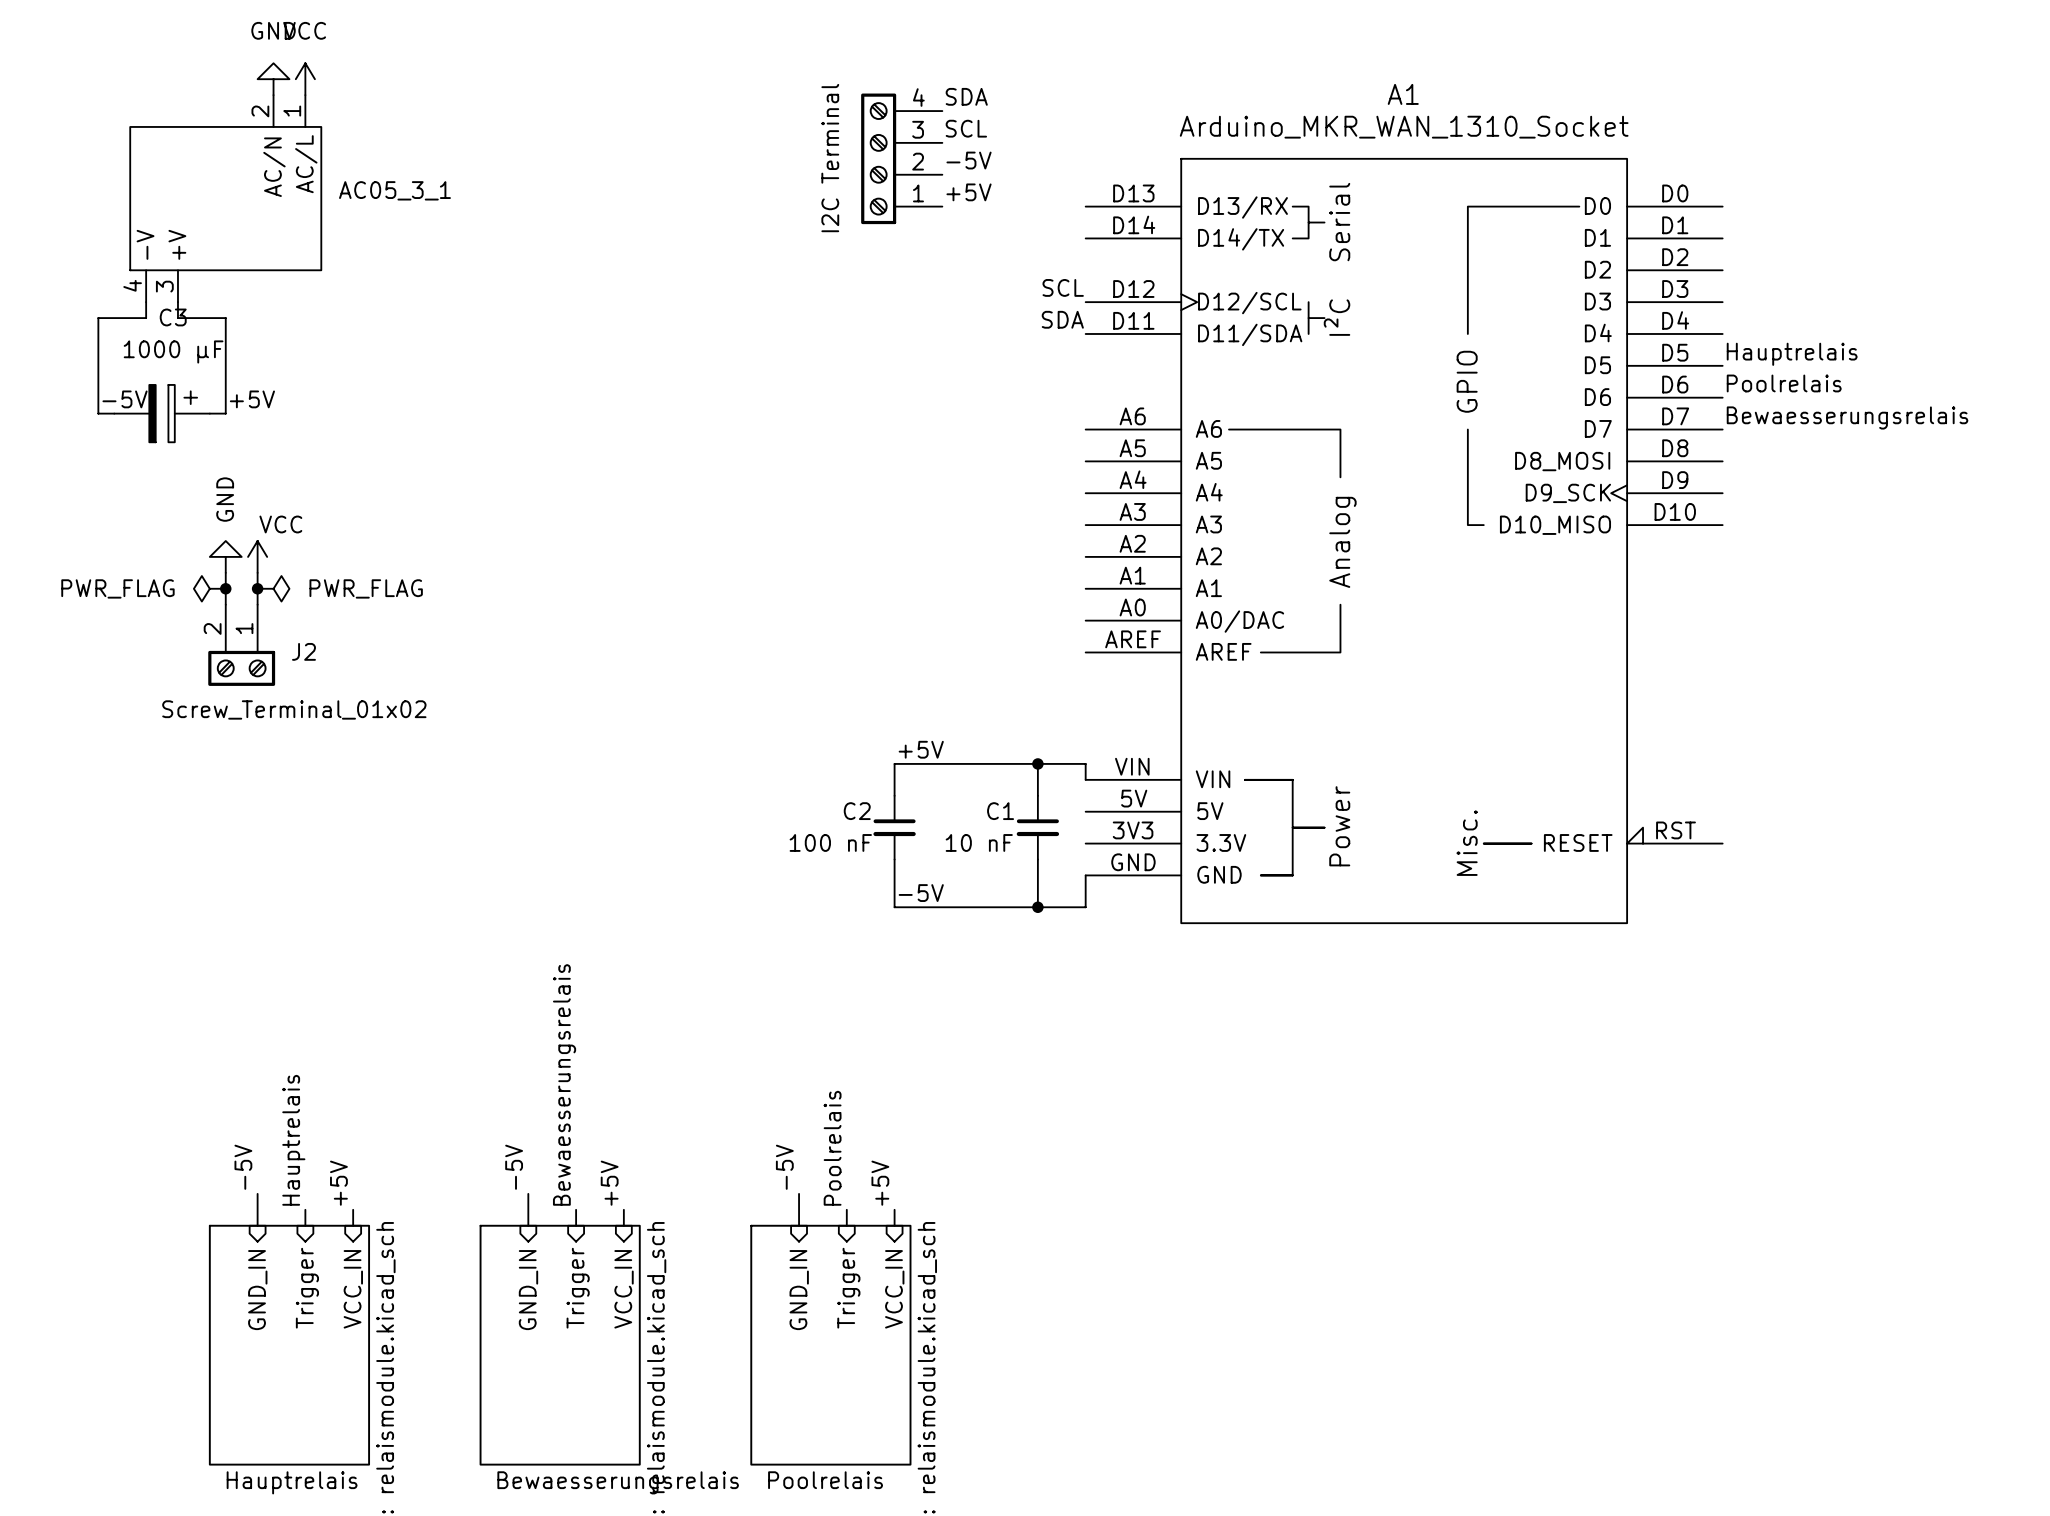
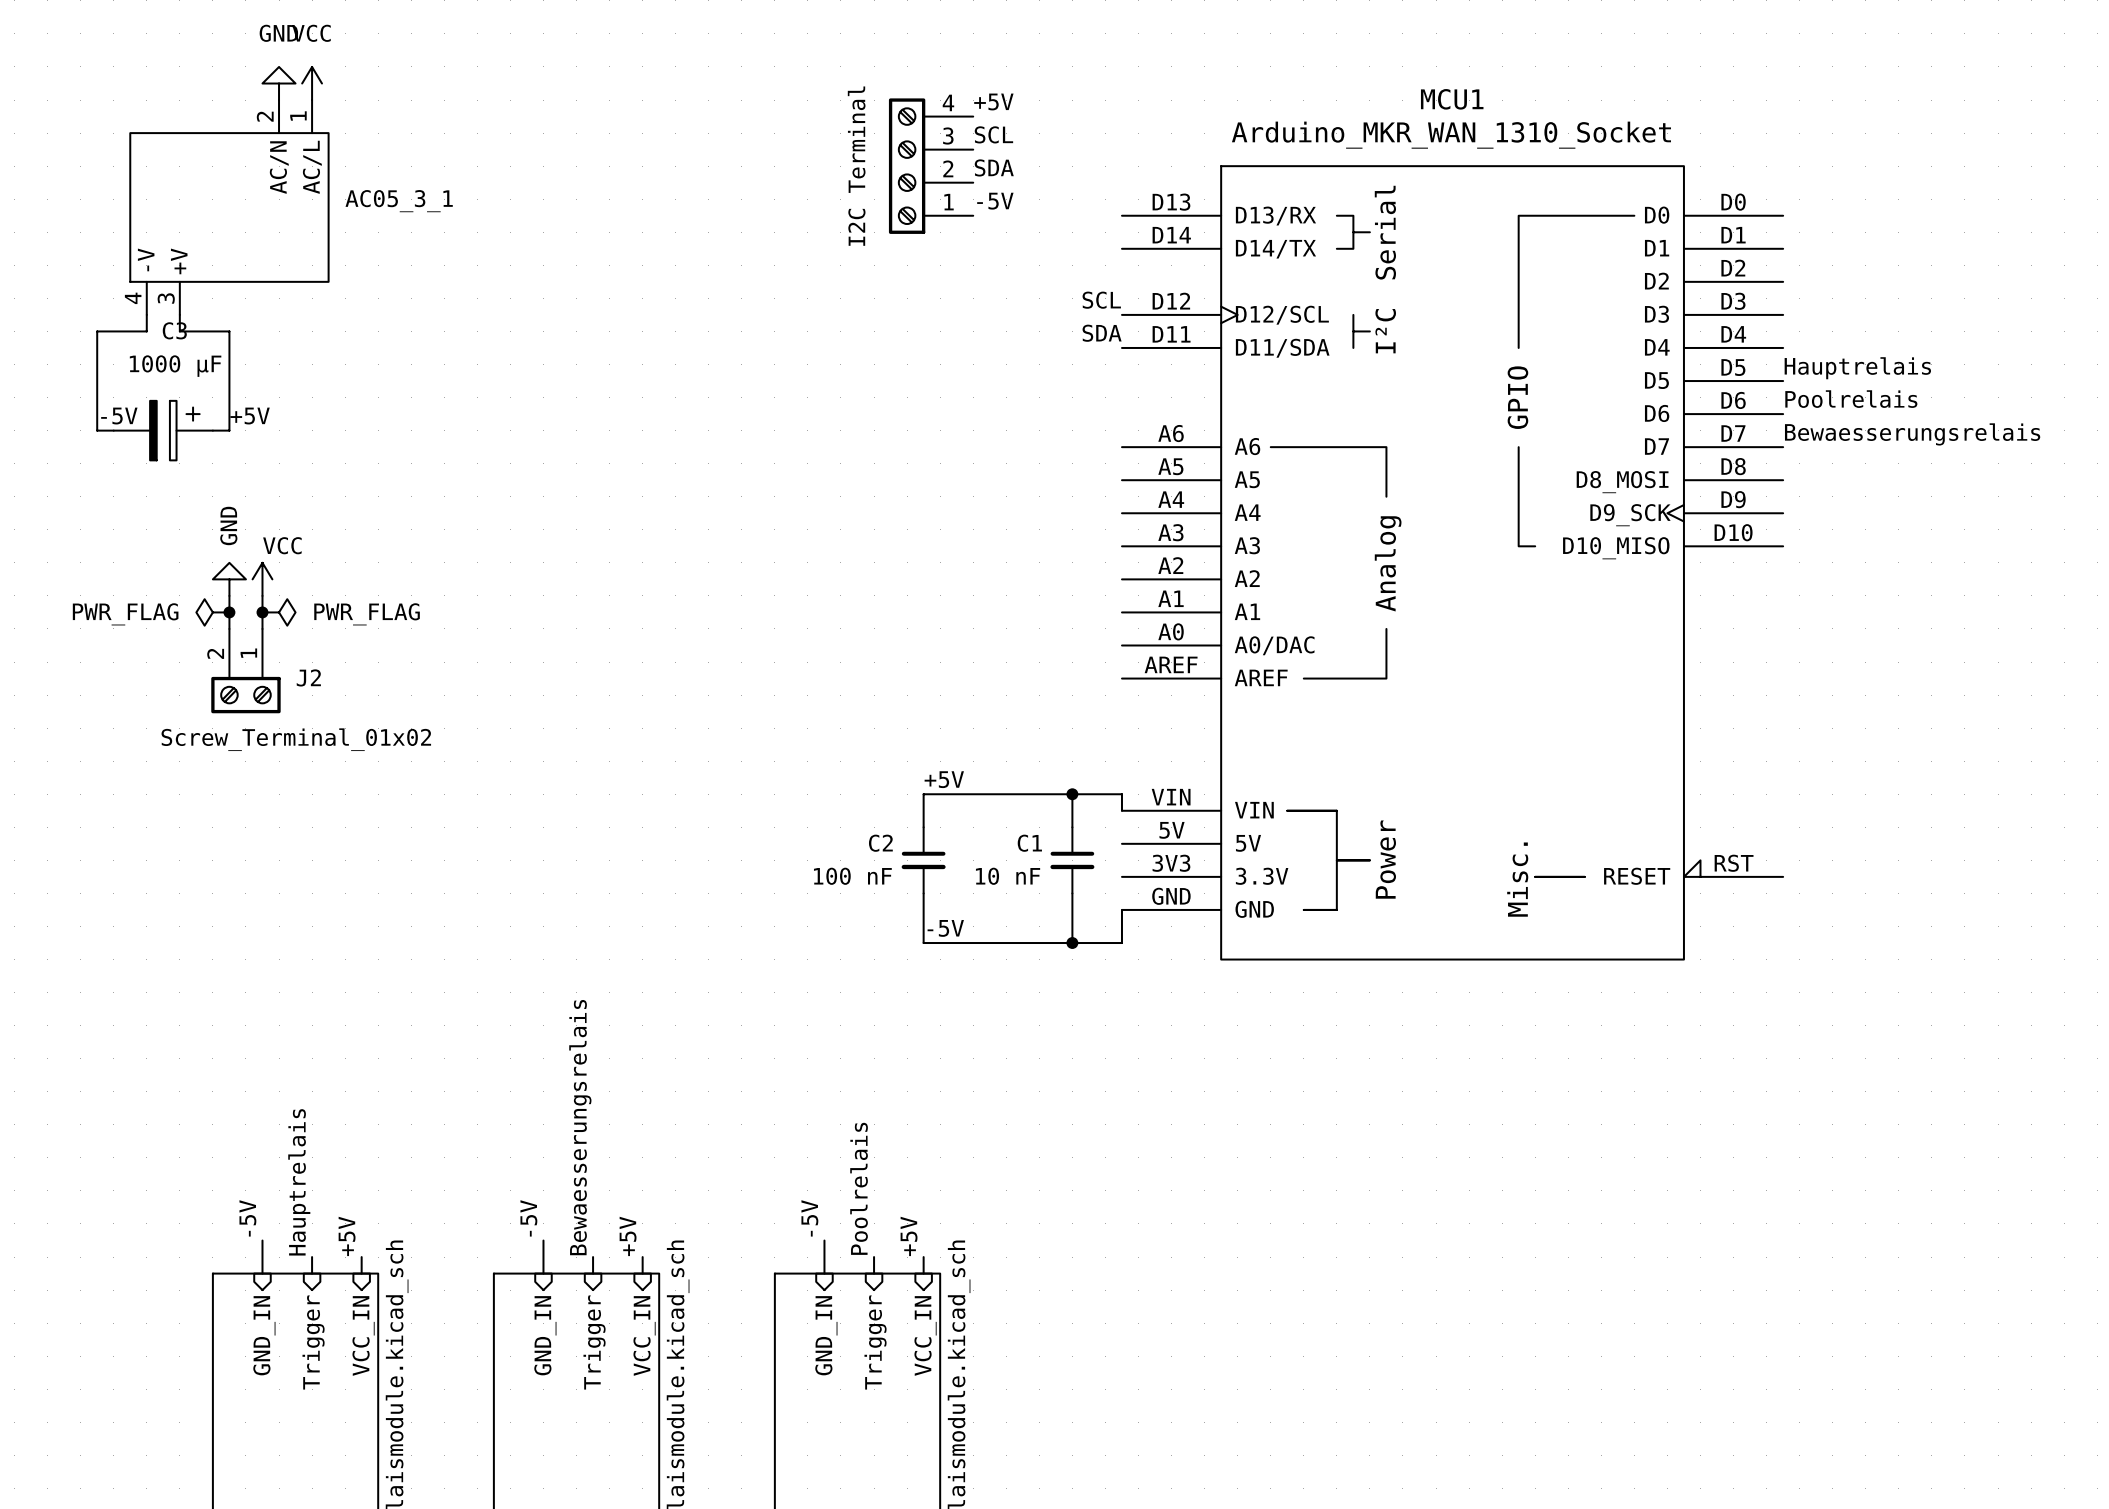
A1 name: A1 (1403, 94) -> MCU1 (1452, 99)
label: SDA (966, 96) -> +5V (993, 101)
label: -5V (969, 160) -> SDA (994, 167)
label: +5V (969, 192) -> -5V (995, 201)

